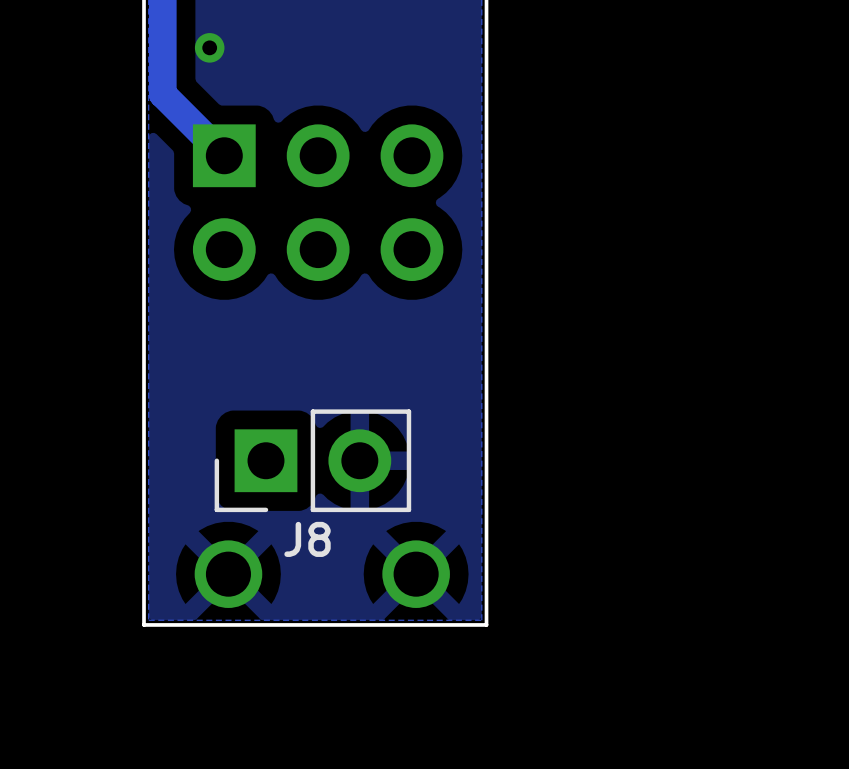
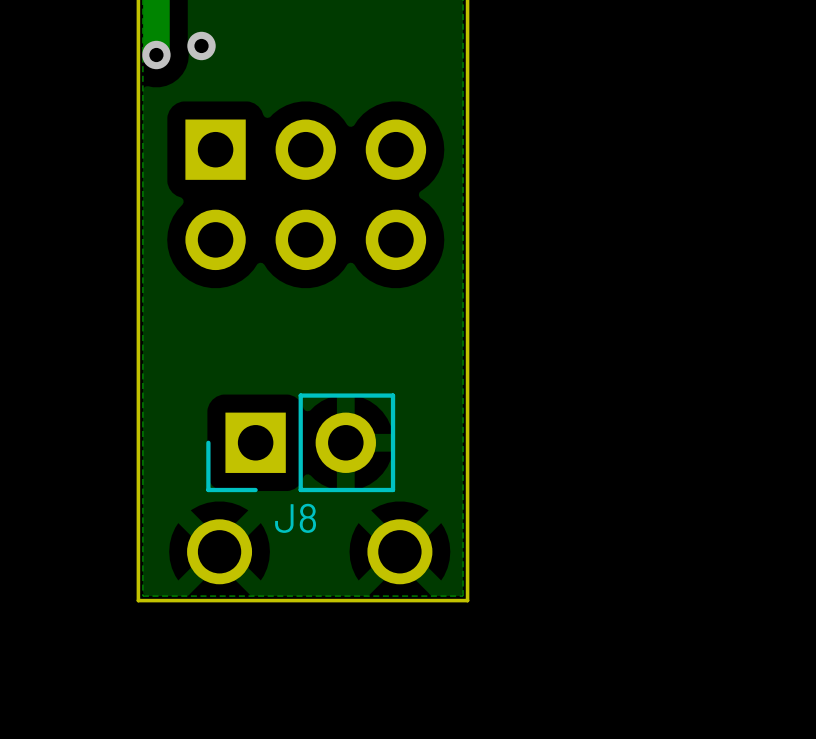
track: (162, 57) (162, 94) (224, 155) -> none
via: none -> (156, 55)

